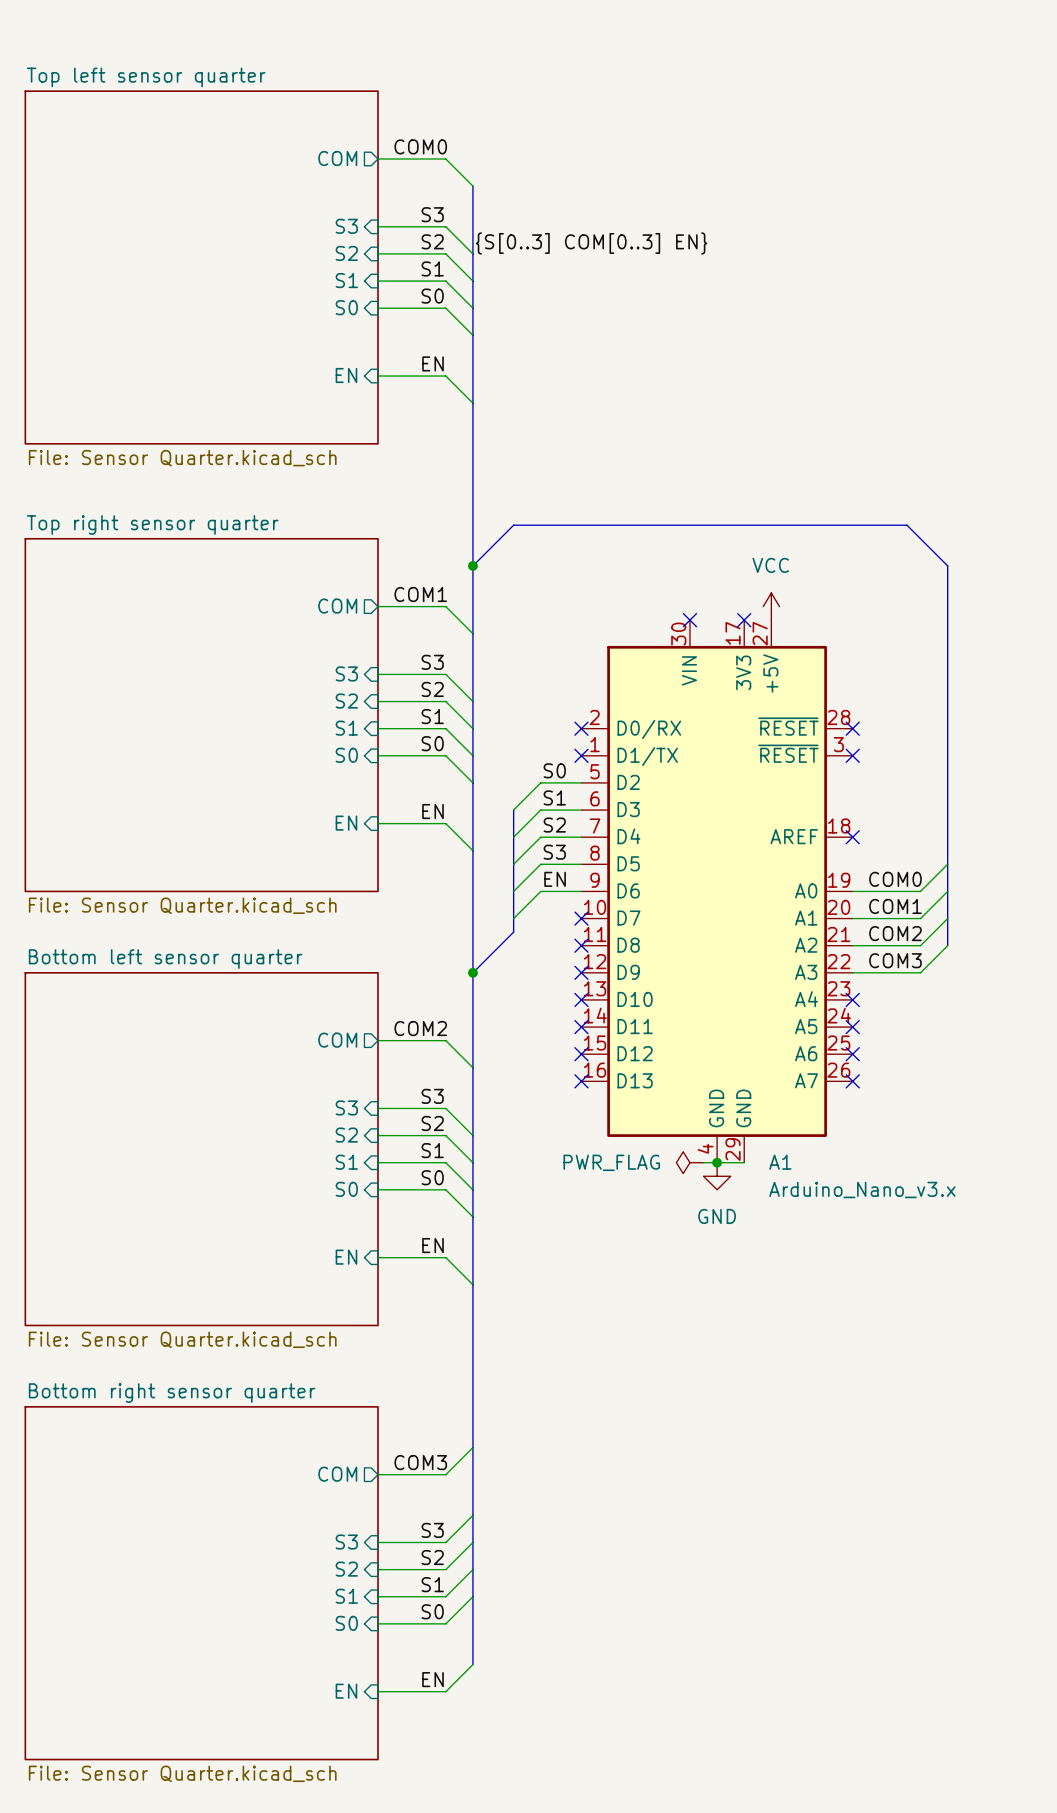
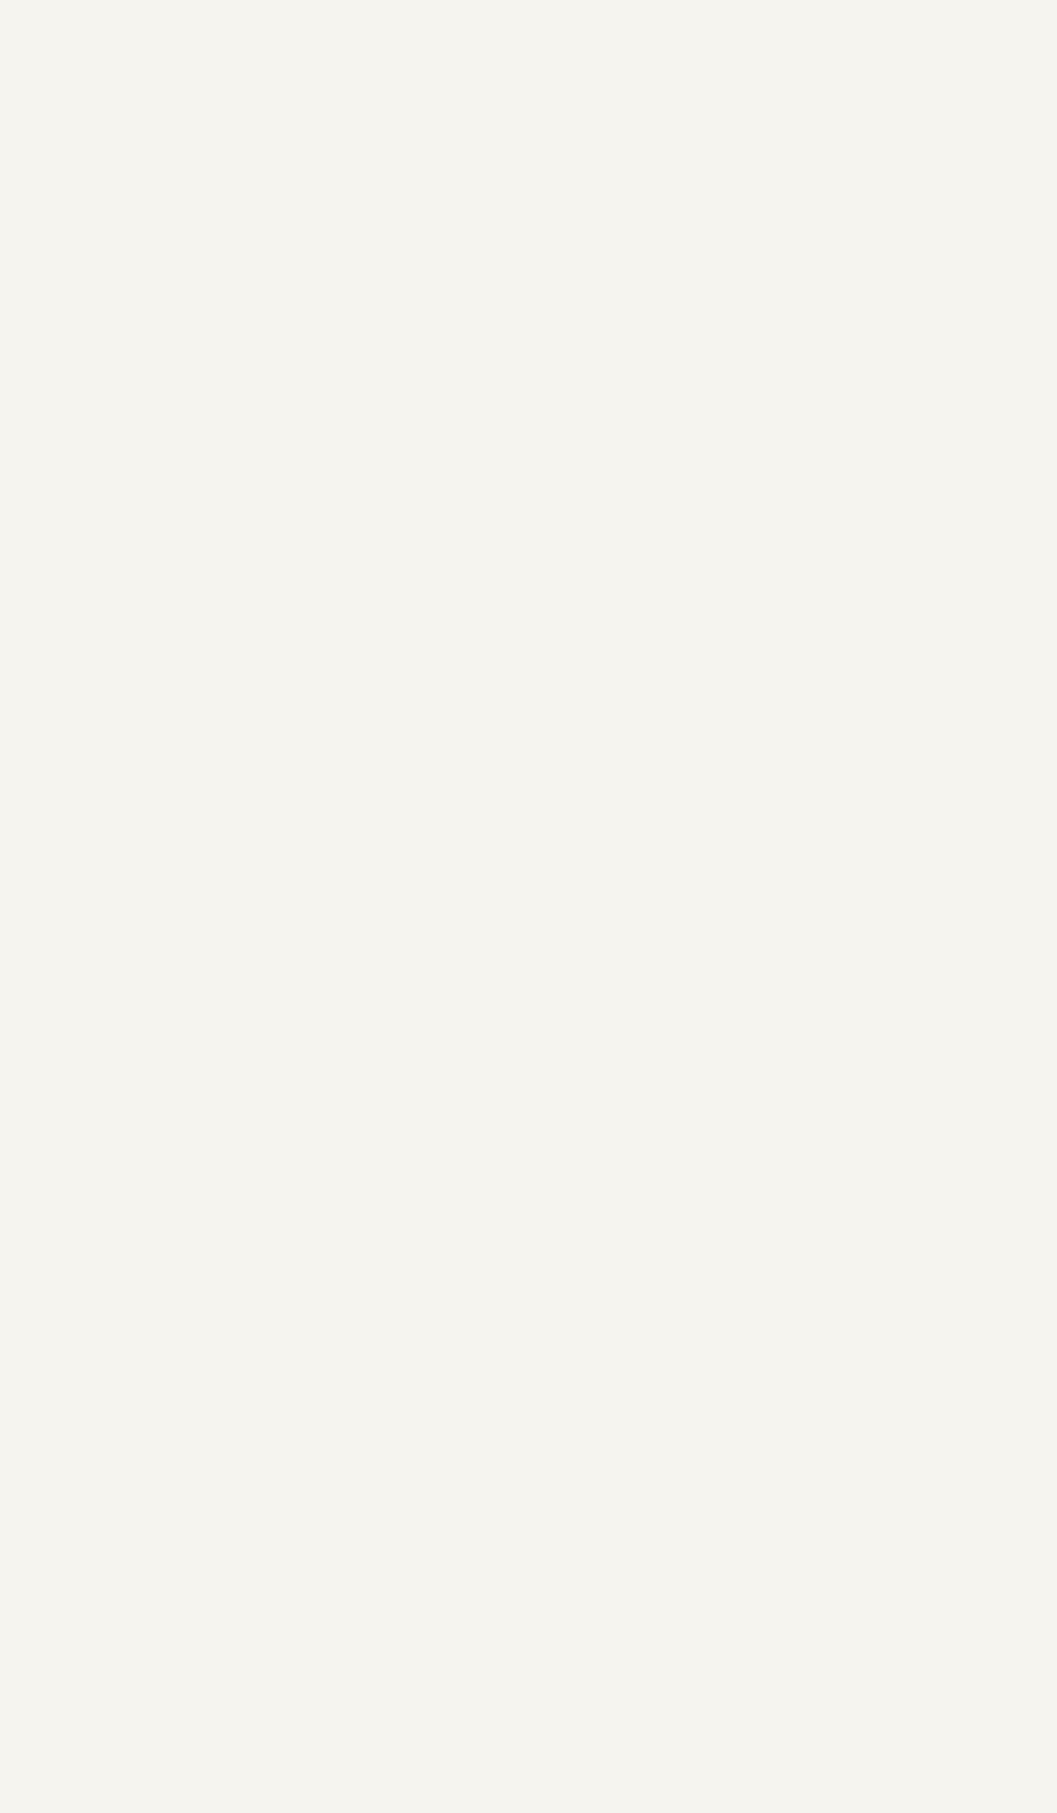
label: COM0 (420, 146) -> none
sheet pin: COM (337, 158) -> none
wire: (378, 158) (445, 158) (472, 186) -> none
bus: (472, 186) (472, 1664) -> none
label: S3 (432, 214) -> none
sheet pin: S3 (346, 226) -> none
wire: (378, 226) (445, 226) (472, 253) -> none
label: S2 (432, 241) -> none
label: {S[0..3] COM[0..3] EN} (591, 243) -> none
sheet pin: S2 (346, 253) -> none
wire: (378, 253) (445, 253) (472, 281) -> none
sheet Top left sensor quarter: File: Sensor Quarter.kicad_sch (201, 267) -> none
label: S1 (432, 268) -> none
sheet pin: S1 (346, 280) -> none
wire: (378, 281) (445, 281) (472, 308) -> none
label: S0 (432, 296) -> none
sheet pin: S0 (346, 307) -> none
wire: (378, 308) (445, 308) (472, 335) -> none
label: EN (433, 363) -> none
sheet pin: EN (346, 375) -> none
wire: (378, 376) (445, 376) (472, 403) -> none
bus: (472, 565) (513, 525) (906, 525) (947, 565) (947, 945) -> none
junction: (472, 565) -> none
label: COM1 (420, 594) -> none
sheet pin: COM (337, 606) -> none
wire: (378, 606) (445, 606) (472, 633) -> none
power symbol: VCC (771, 606) -> none
no-connect mark: (689, 620) -> none
no-connect mark: (744, 620) -> none
label: S3 (432, 662) -> none
sheet pin: S3 (346, 673) -> none
wire: (378, 674) (445, 674) (472, 701) -> none
label: S2 (432, 689) -> none
sheet pin: S2 (346, 701) -> none
wire: (378, 701) (445, 701) (472, 728) -> none
sheet Top right sensor quarter: File: Sensor Quarter.kicad_sch (201, 715) -> none
label: S1 (432, 716) -> none
sheet pin: S1 (346, 728) -> none
wire: (378, 728) (445, 728) (472, 755) -> none
no-connect mark: (581, 728) -> none
no-connect mark: (852, 728) -> none
label: S0 (432, 743) -> none
sheet pin: S0 (346, 755) -> none
wire: (378, 755) (445, 755) (472, 782) -> none
no-connect mark: (581, 755) -> none
no-connect mark: (852, 755) -> none
label: S0 (554, 770) -> none
wire: (581, 782) (540, 782) (513, 810) -> none
label: S1 (554, 797) -> none
bus: (513, 810) (513, 932) (472, 972) -> none
wire: (581, 810) (540, 810) (513, 837) -> none
label: EN (433, 811) -> none
sheet pin: EN (346, 823) -> none
wire: (378, 823) (445, 823) (472, 850) -> none
label: S2 (554, 825) -> none
wire: (581, 837) (540, 837) (513, 864) -> none
no-connect mark: (852, 837) -> none
label: S3 (554, 852) -> none
wire: (581, 864) (540, 864) (513, 891) -> none
wire: (947, 864) (920, 891) (852, 891) -> none
label: EN (555, 879) -> none
label: COM0 (895, 879) -> none
wire: (581, 891) (540, 891) (513, 918) -> none
A1: Arduino_Nano_v3.x (717, 891) -> none
wire: (947, 891) (920, 918) (852, 918) -> none
label: COM1 (895, 906) -> none
no-connect mark: (581, 918) -> none
wire: (947, 918) (920, 945) (852, 945) -> none
label: COM2 (895, 933) -> none
no-connect mark: (581, 945) -> none
wire: (947, 945) (920, 972) (852, 972) -> none
label: COM3 (895, 960) -> none
junction: (472, 972) -> none
no-connect mark: (581, 972) -> none
no-connect mark: (581, 999) -> none
no-connect mark: (852, 999) -> none
no-connect mark: (581, 1027) -> none
no-connect mark: (852, 1027) -> none
label: COM2 (420, 1028) -> none
sheet pin: COM (337, 1040) -> none
wire: (378, 1040) (445, 1040) (472, 1067) -> none
no-connect mark: (581, 1054) -> none
no-connect mark: (852, 1054) -> none
no-connect mark: (581, 1081) -> none
no-connect mark: (852, 1081) -> none
label: S3 (432, 1096) -> none
sheet pin: S3 (346, 1107) -> none
wire: (378, 1108) (445, 1108) (472, 1135) -> none
label: S2 (432, 1123) -> none
sheet pin: S2 (346, 1135) -> none
wire: (378, 1135) (445, 1135) (472, 1162) -> none
sheet Bottom left sensor quarter: File: Sensor Quarter.kicad_sch (201, 1149) -> none
label: S1 (432, 1150) -> none
sheet pin: S1 (346, 1162) -> none
wire: (378, 1162) (445, 1162) (472, 1189) -> none
power symbol: PWR_FLAG (689, 1162) -> none
wire: (703, 1162) (744, 1162) -> none
junction: (717, 1162) -> none
power symbol: GND (717, 1176) -> none
label: S0 (432, 1177) -> none
sheet pin: S0 (346, 1189) -> none
wire: (378, 1189) (445, 1189) (472, 1216) -> none
label: EN (433, 1245) -> none
sheet pin: EN (346, 1257) -> none
wire: (378, 1257) (445, 1257) (472, 1284) -> none
wire: (472, 1447) (445, 1474) (378, 1474) -> none
label: COM3 (420, 1462) -> none
sheet pin: COM (337, 1474) -> none
wire: (472, 1515) (445, 1542) (378, 1542) -> none
label: S3 (432, 1530) -> none
sheet pin: S3 (346, 1541) -> none
wire: (472, 1542) (445, 1569) (378, 1569) -> none
label: S2 (432, 1557) -> none
sheet pin: S2 (346, 1569) -> none
wire: (472, 1569) (445, 1596) (378, 1596) -> none
sheet Bottom right sensor quarter: File: Sensor Quarter.kicad_sch (201, 1583) -> none
label: S1 (432, 1584) -> none
sheet pin: S1 (346, 1596) -> none
wire: (472, 1596) (445, 1623) (378, 1623) -> none
label: S0 (432, 1611) -> none
sheet pin: S0 (346, 1623) -> none
wire: (472, 1664) (445, 1691) (378, 1691) -> none
label: EN (433, 1679) -> none
sheet pin: EN (346, 1691) -> none

